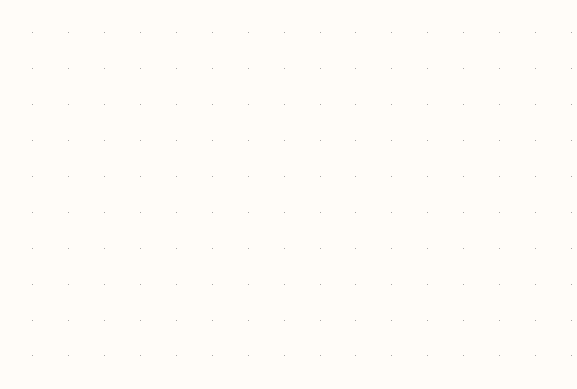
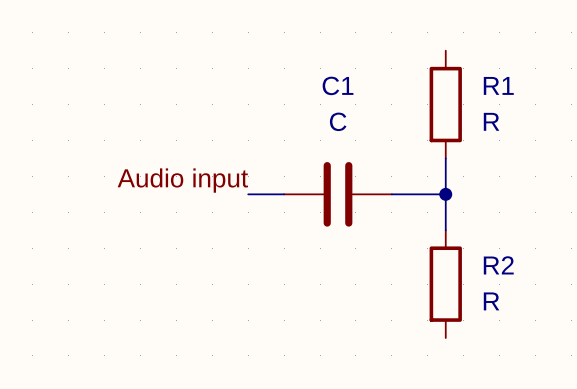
R1: none -> R (445, 104)
wire: none -> (445, 158) (445, 230)
label: none -> Audio input (182, 180)
wire: none -> (248, 194) (284, 194)
C1: none -> C (338, 194)
wire: none -> (391, 194) (445, 194)
junction: none -> (445, 194)
R2: none -> R (445, 284)

